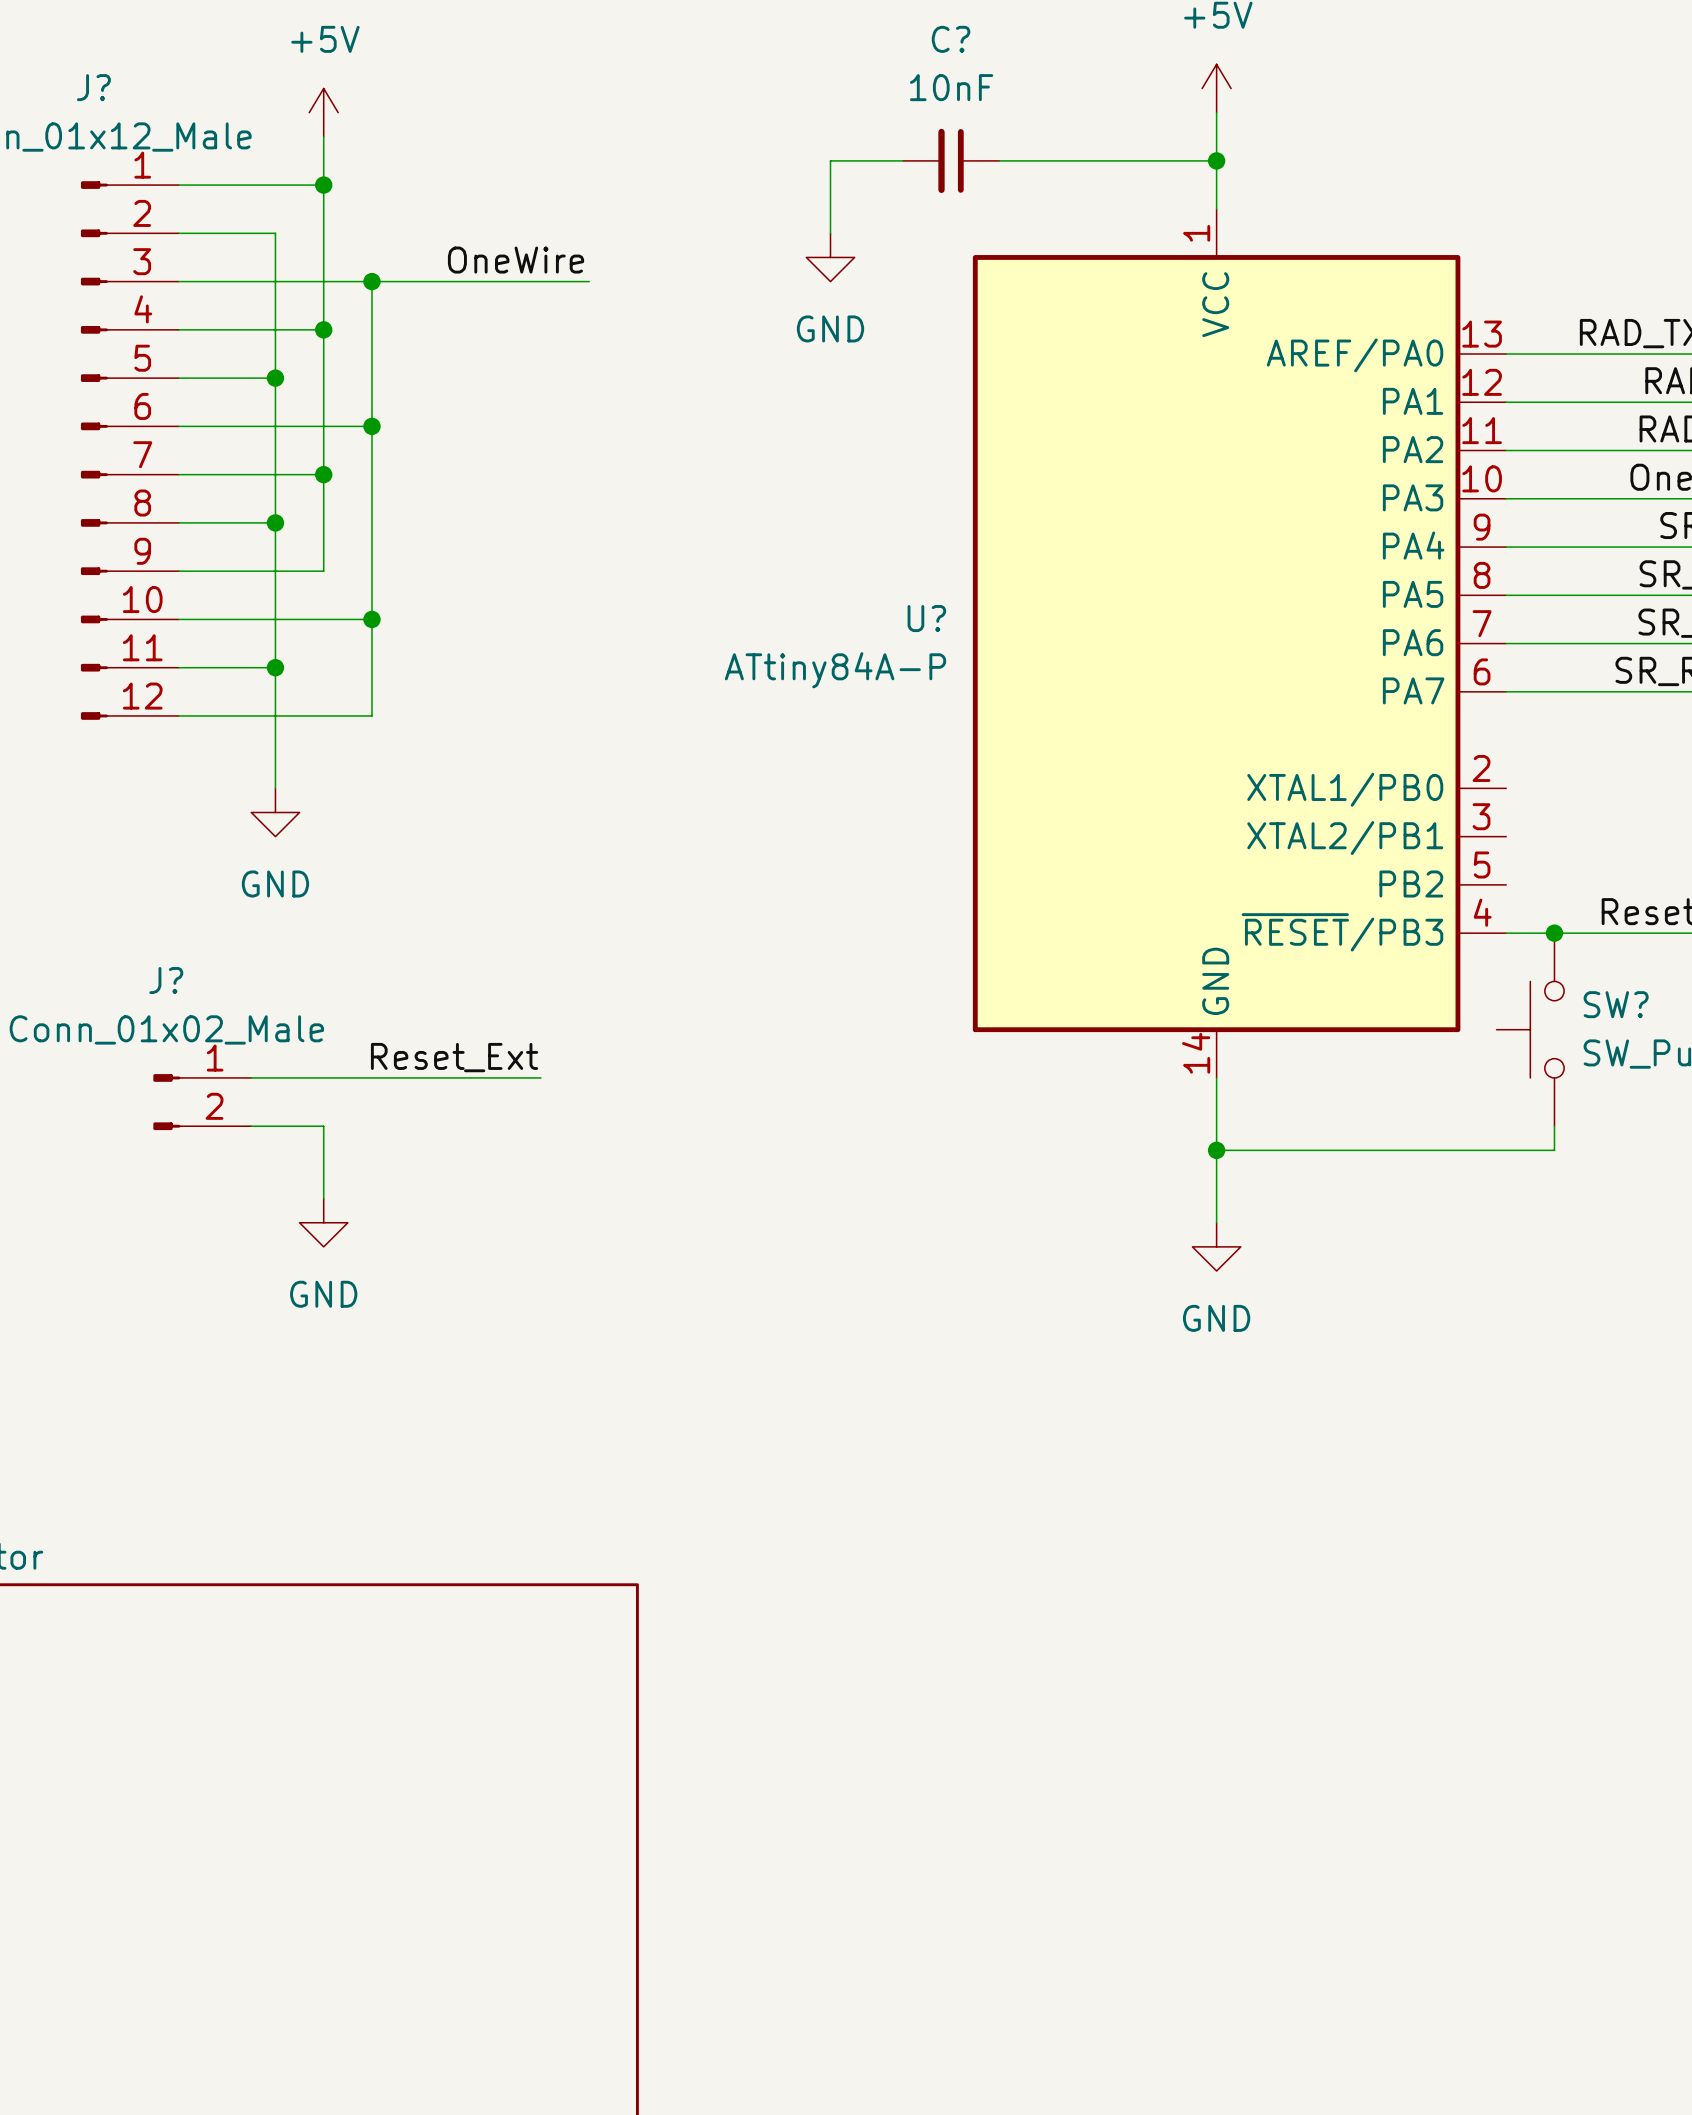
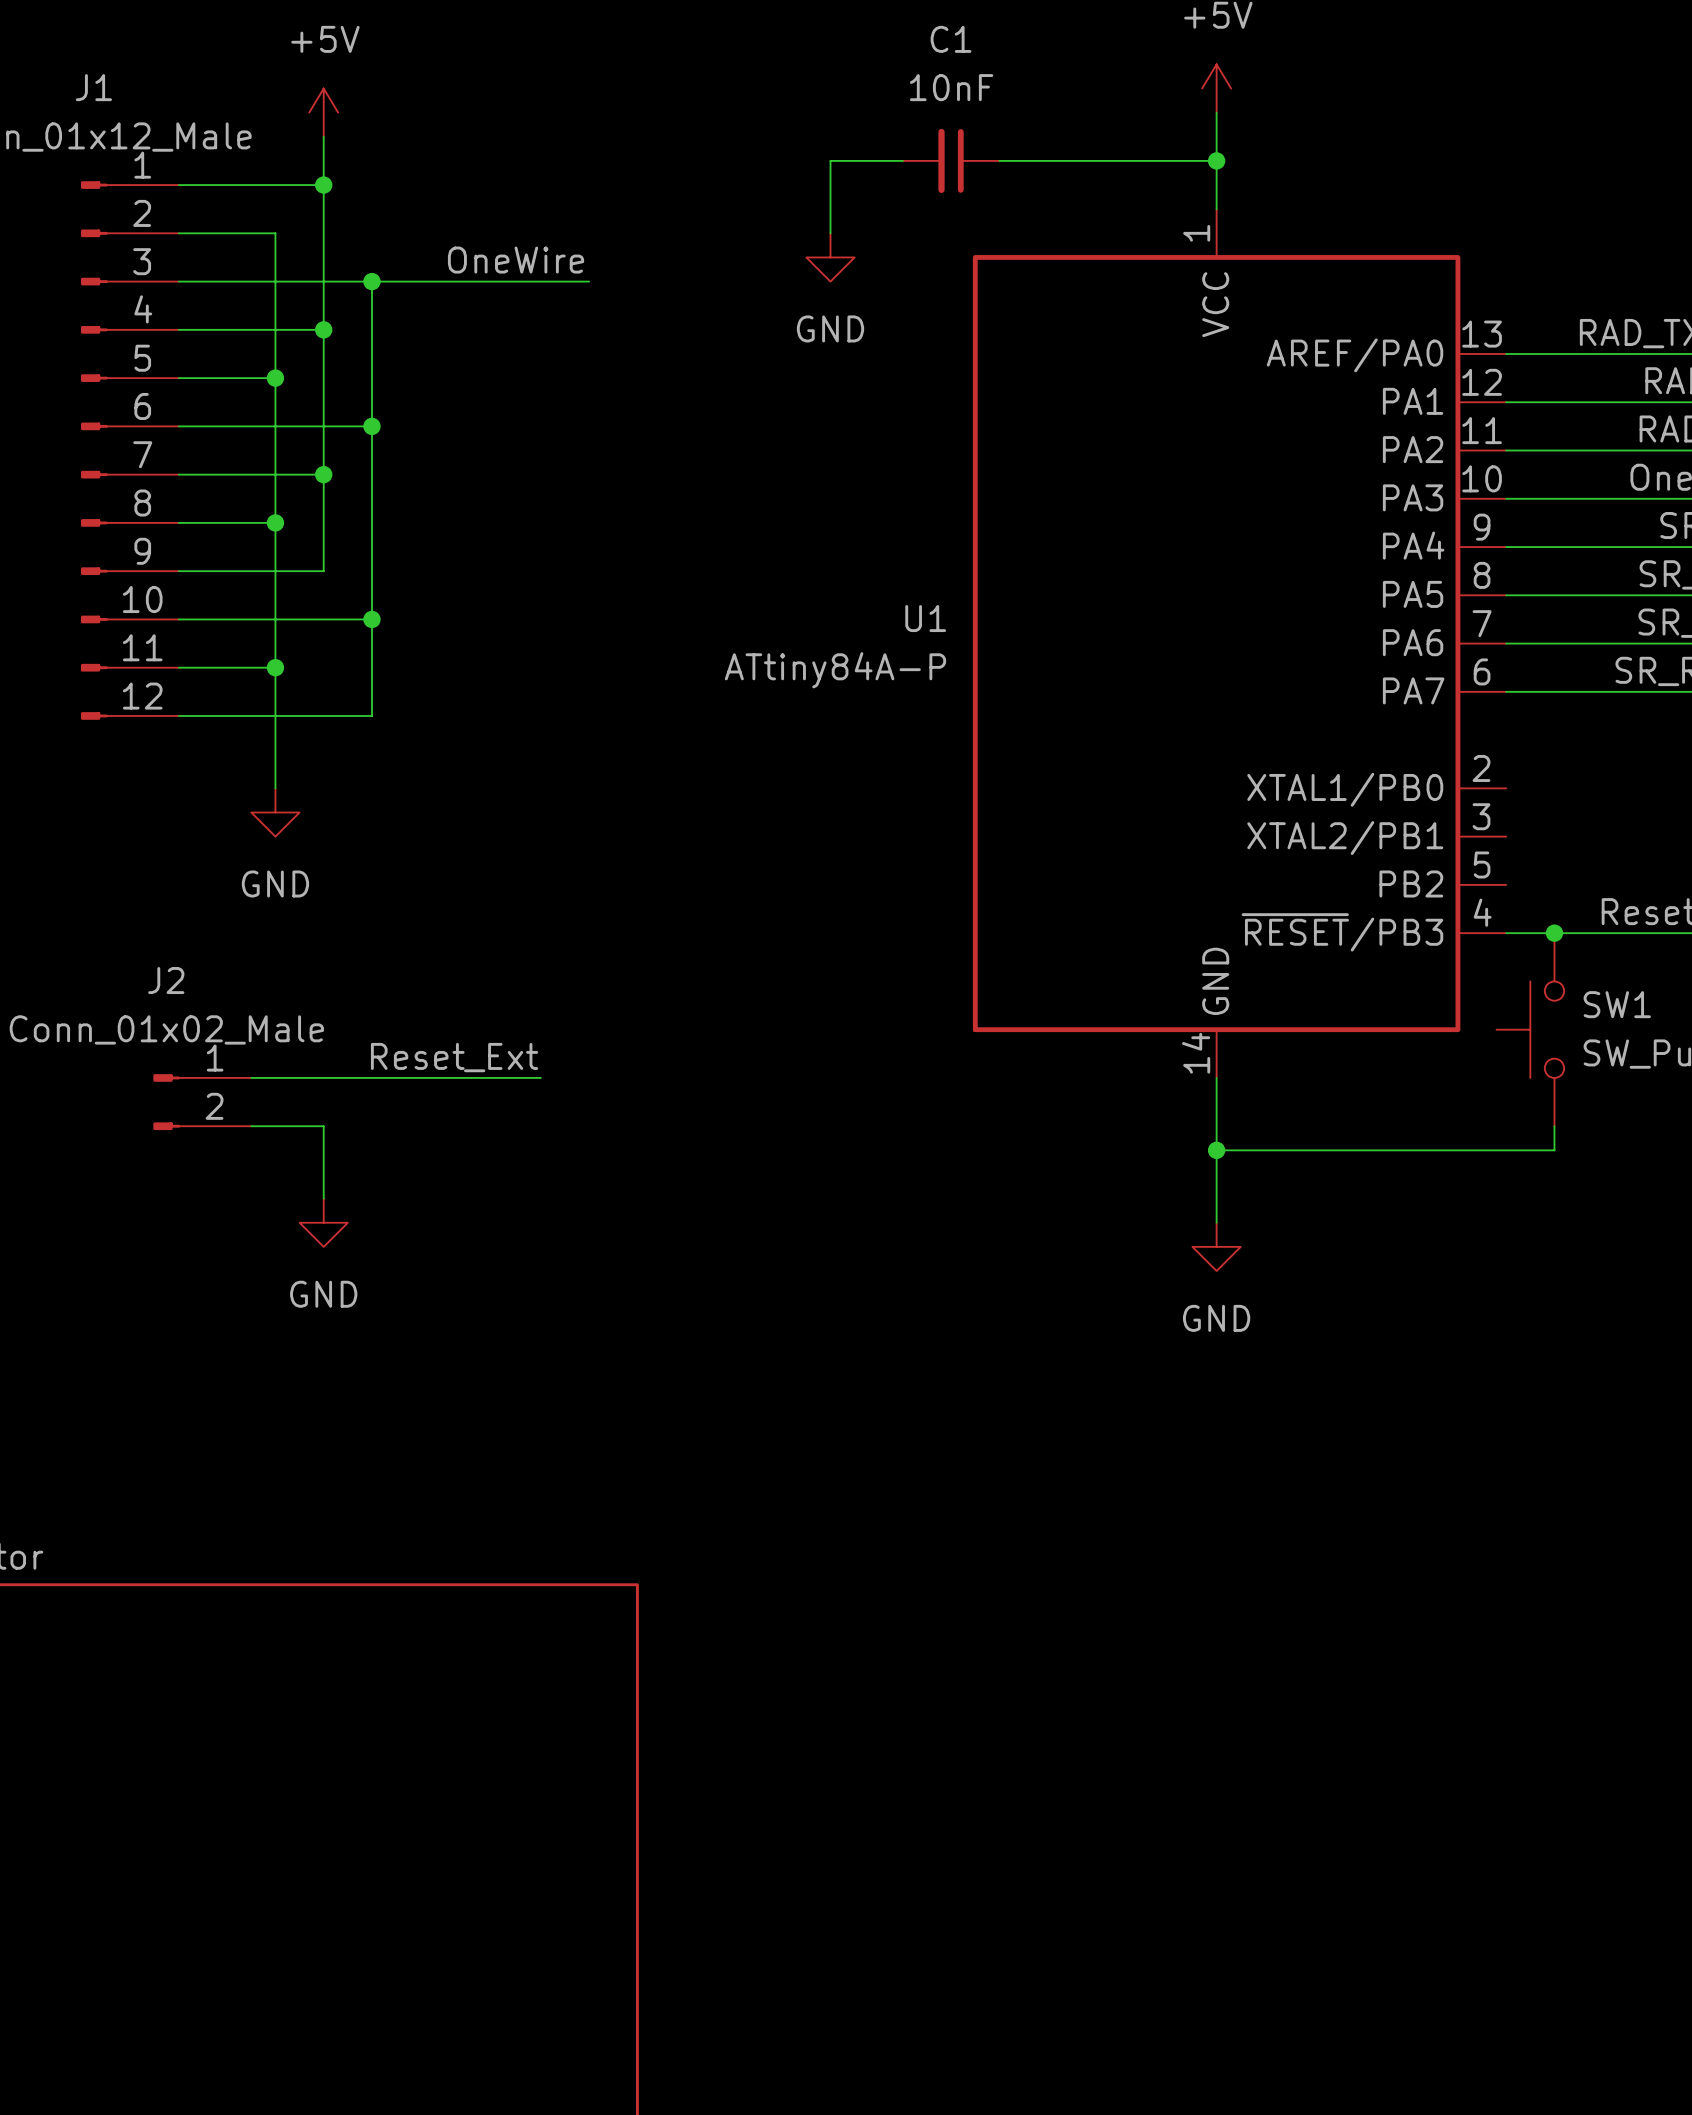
C? name: C? (951, 39) -> C1 (951, 39)
J? name: J? (93, 87) -> J1 (93, 87)
U? name: U? (926, 618) -> U1 (925, 618)
J? name: J? (166, 980) -> J2 (166, 980)
SW? name: SW? (1616, 1004) -> SW1 (1617, 1004)

